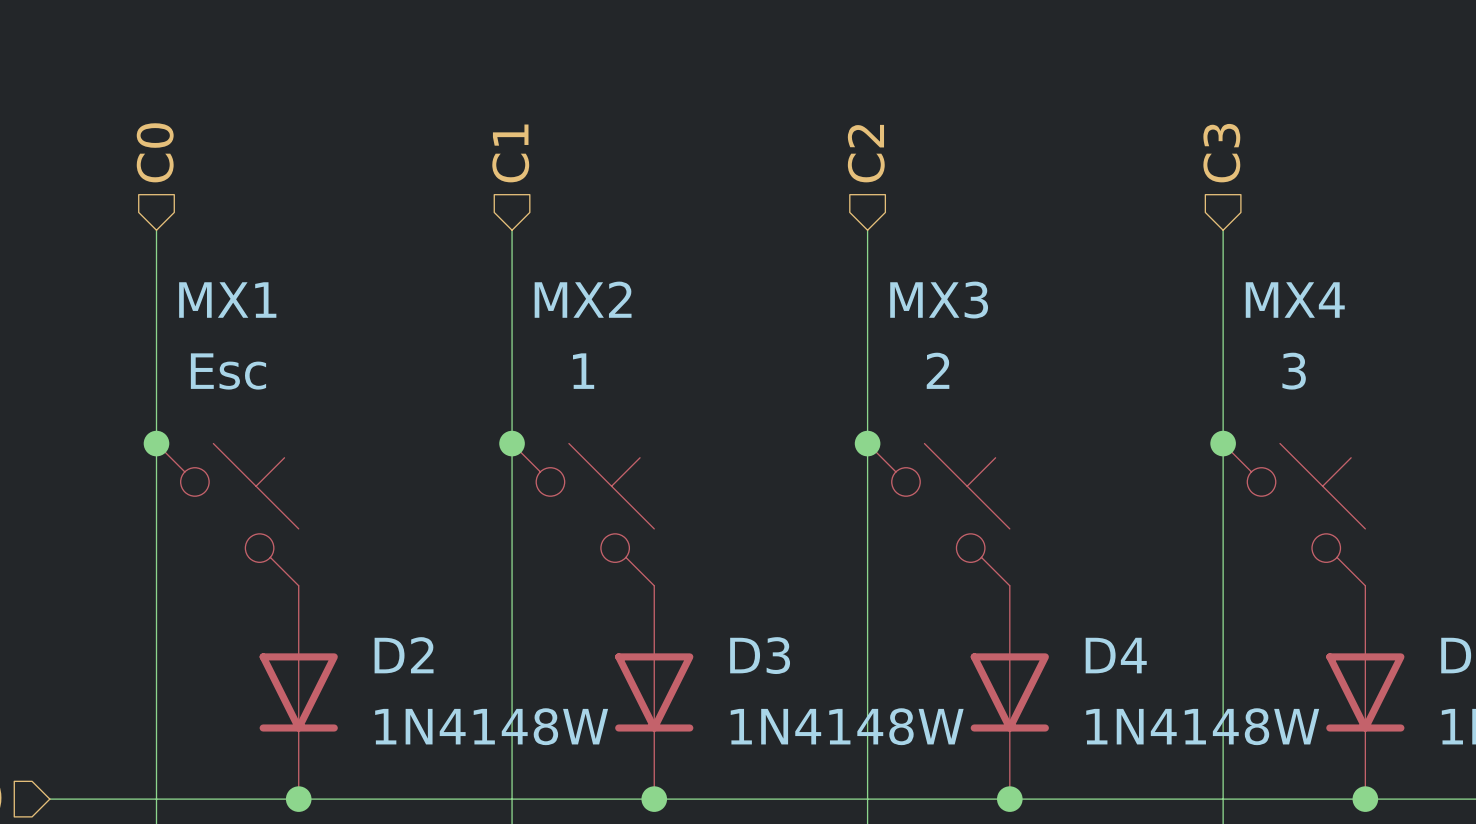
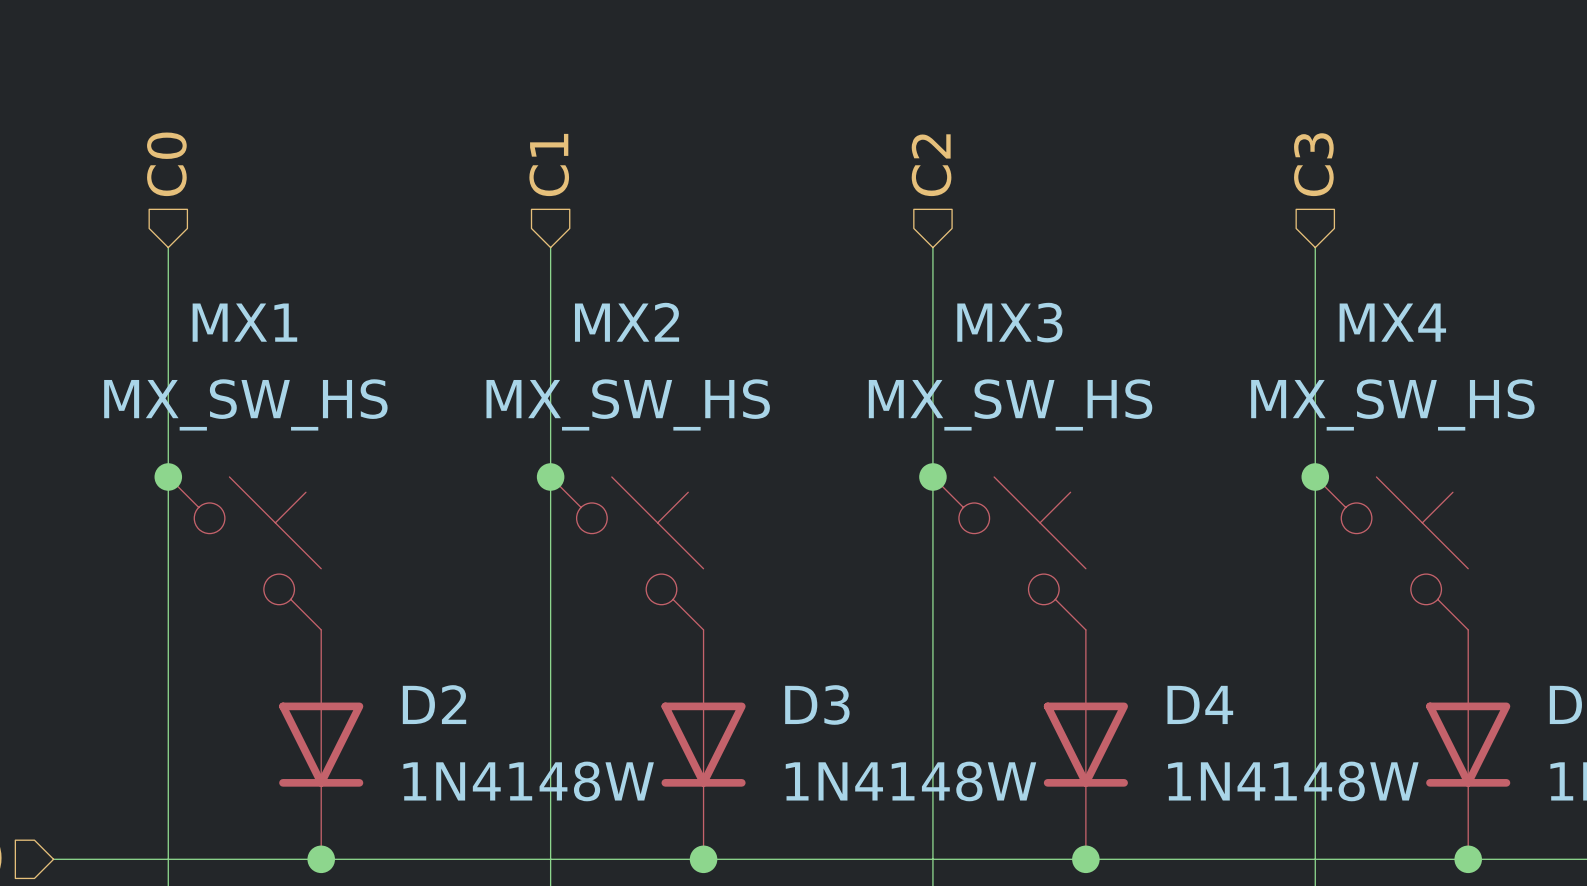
MX3 value: 2 (938, 370) -> MX_SW_HS (1010, 404)
MX1 value: Esc (228, 371) -> MX_SW_HS (245, 404)
MX2 value: 1 (583, 371) -> MX_SW_HS (628, 404)
MX4 value: 3 (1294, 371) -> MX_SW_HS (1392, 404)

